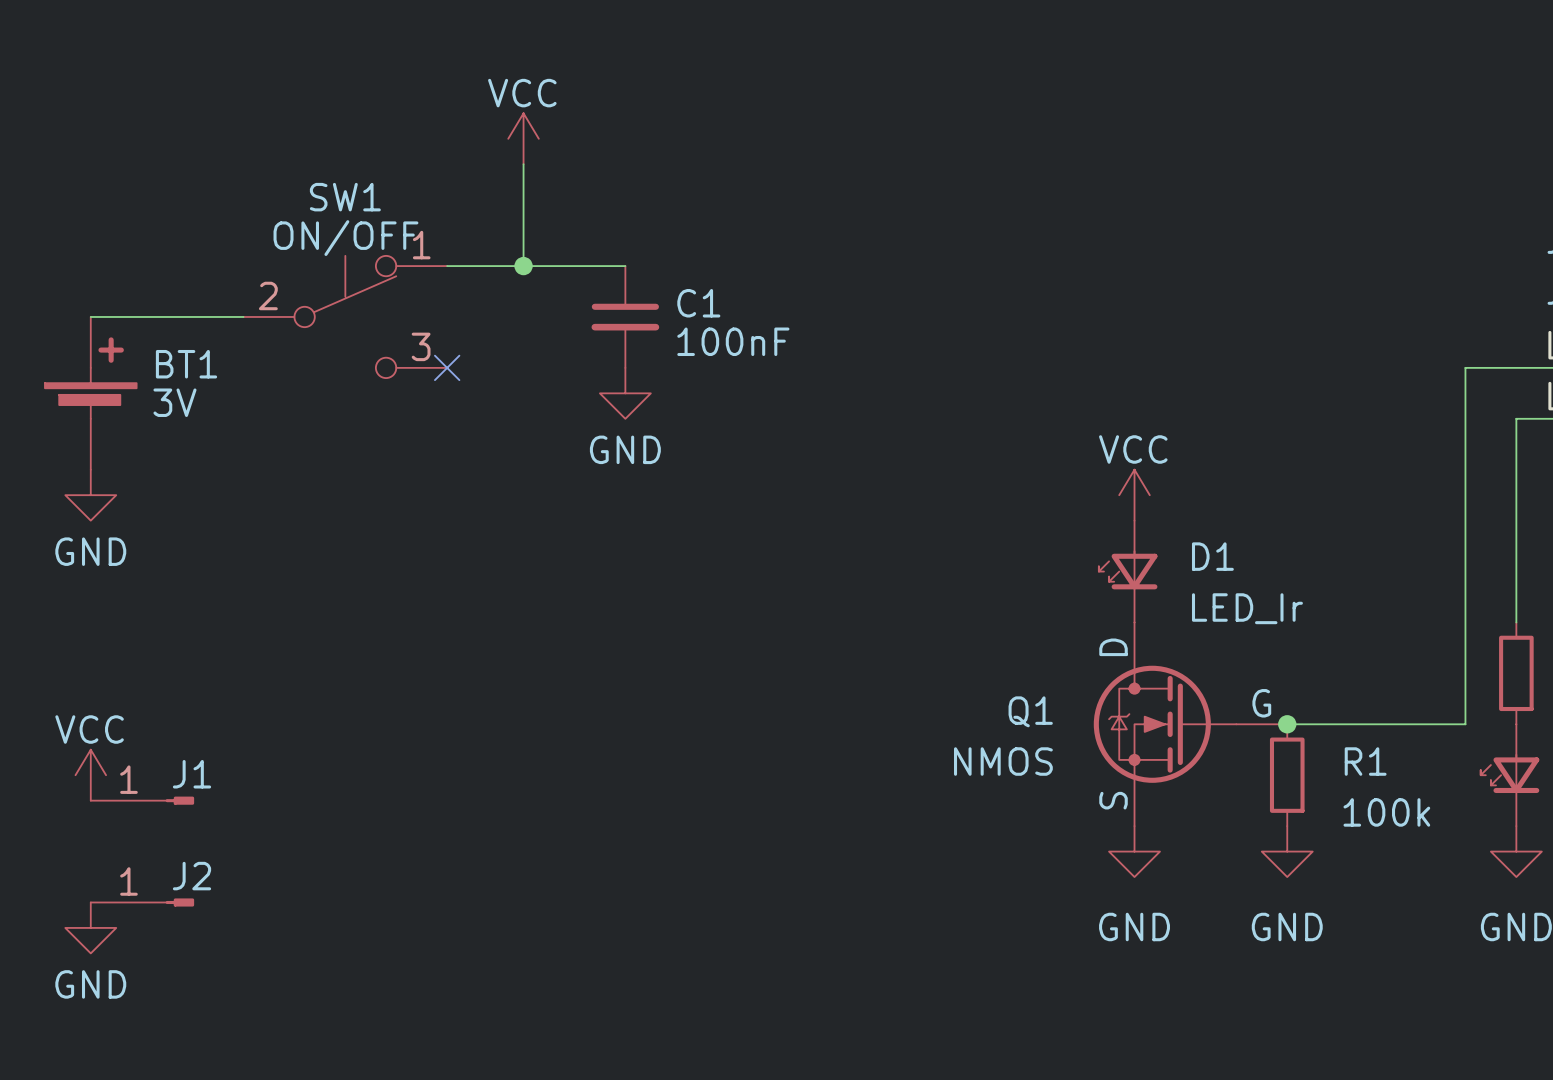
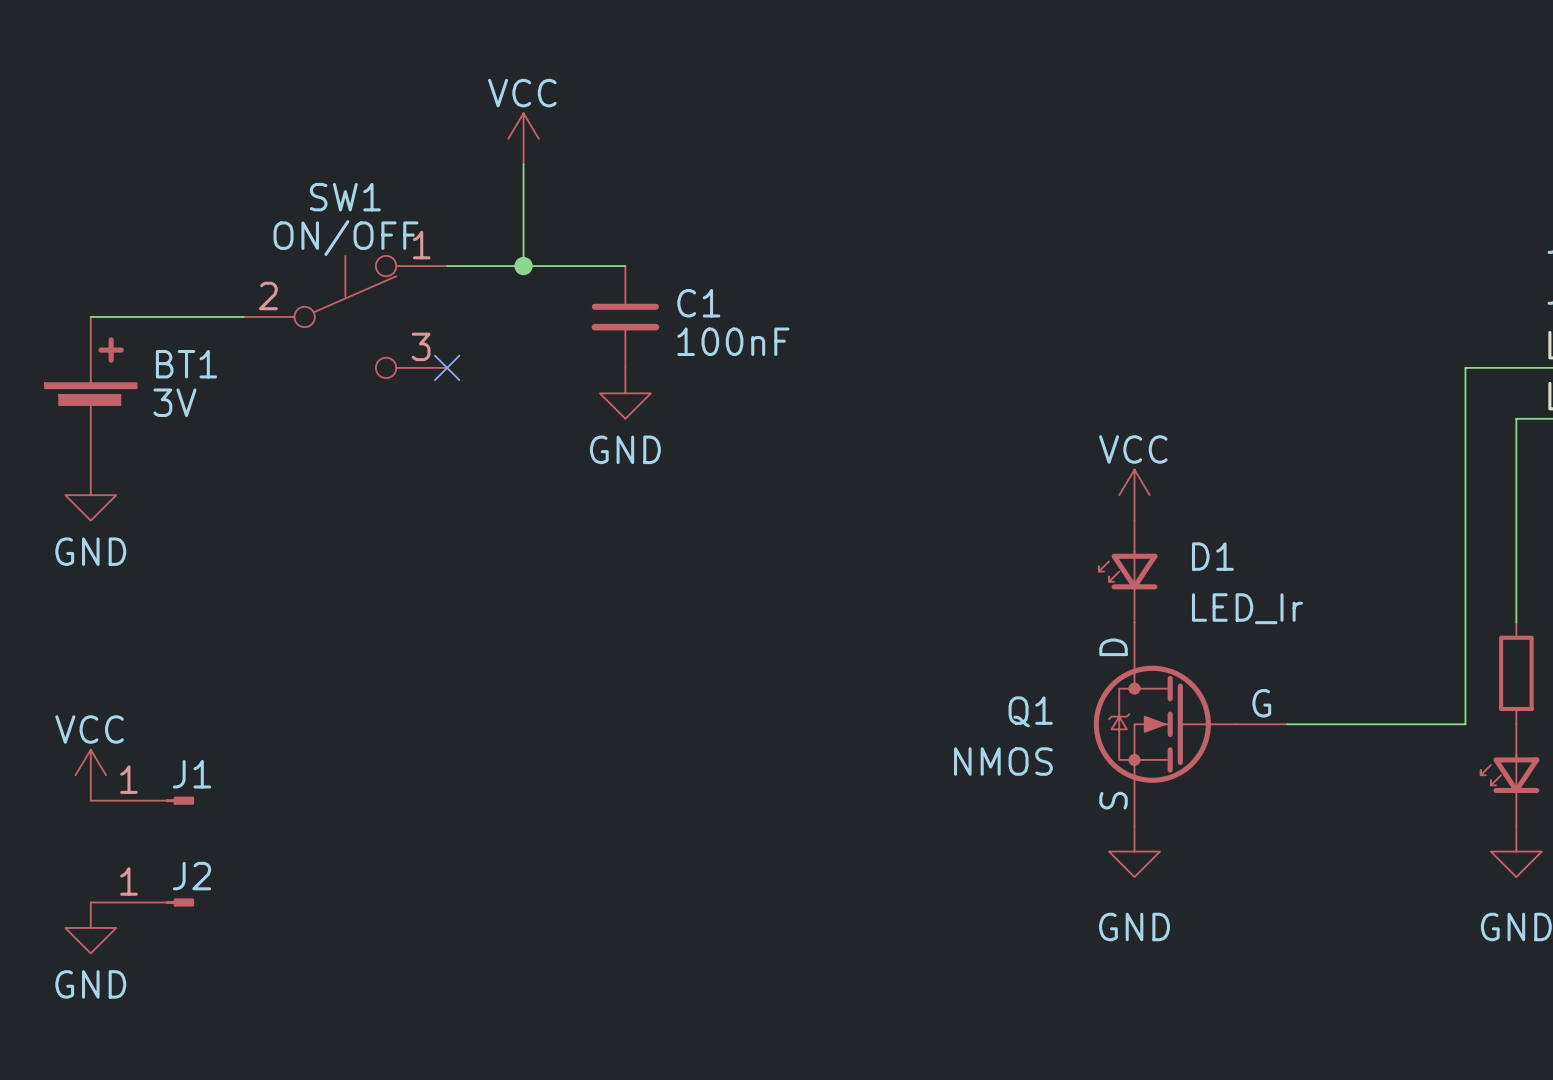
junction: (1287, 724) -> none
R1: 100k (1287, 775) -> none
power symbol: GND (1287, 851) -> none

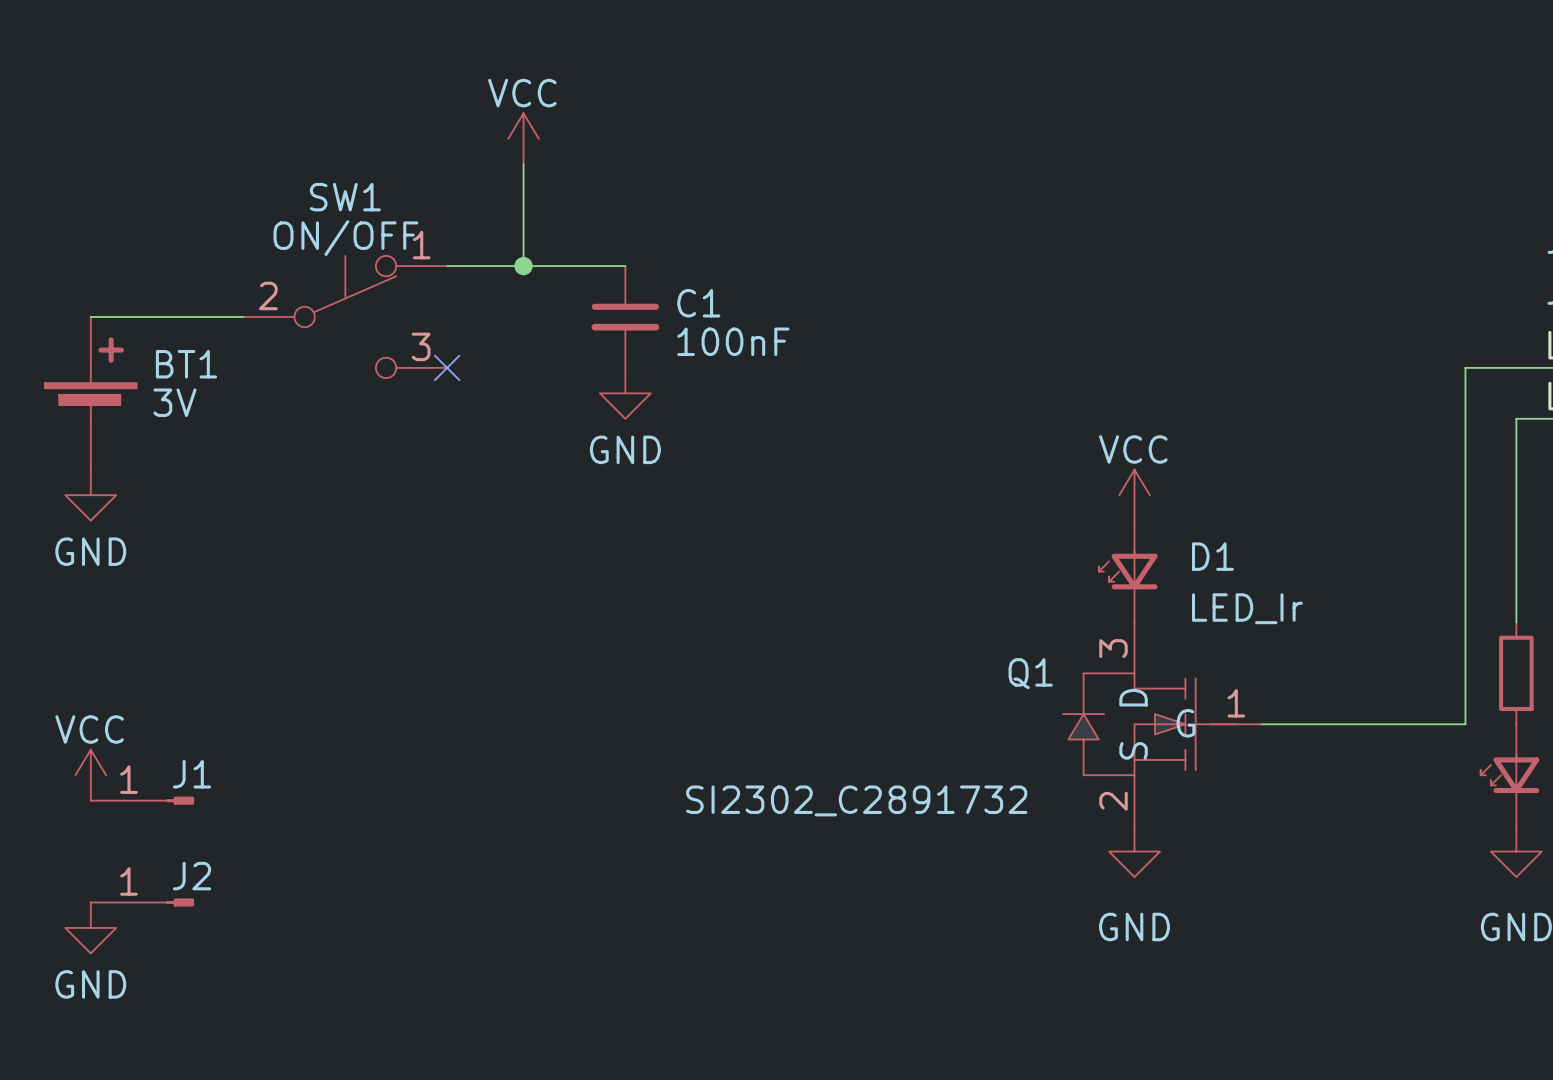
Q1 symbol: [1093, 622, 1288, 827] -> [1063, 622, 1262, 827]
Q1 name position: Q1 (1030, 711) -> Q1 (1030, 673)
Q1 value: NMOS (1003, 761) -> SI2302_C2891732 (856, 800)

